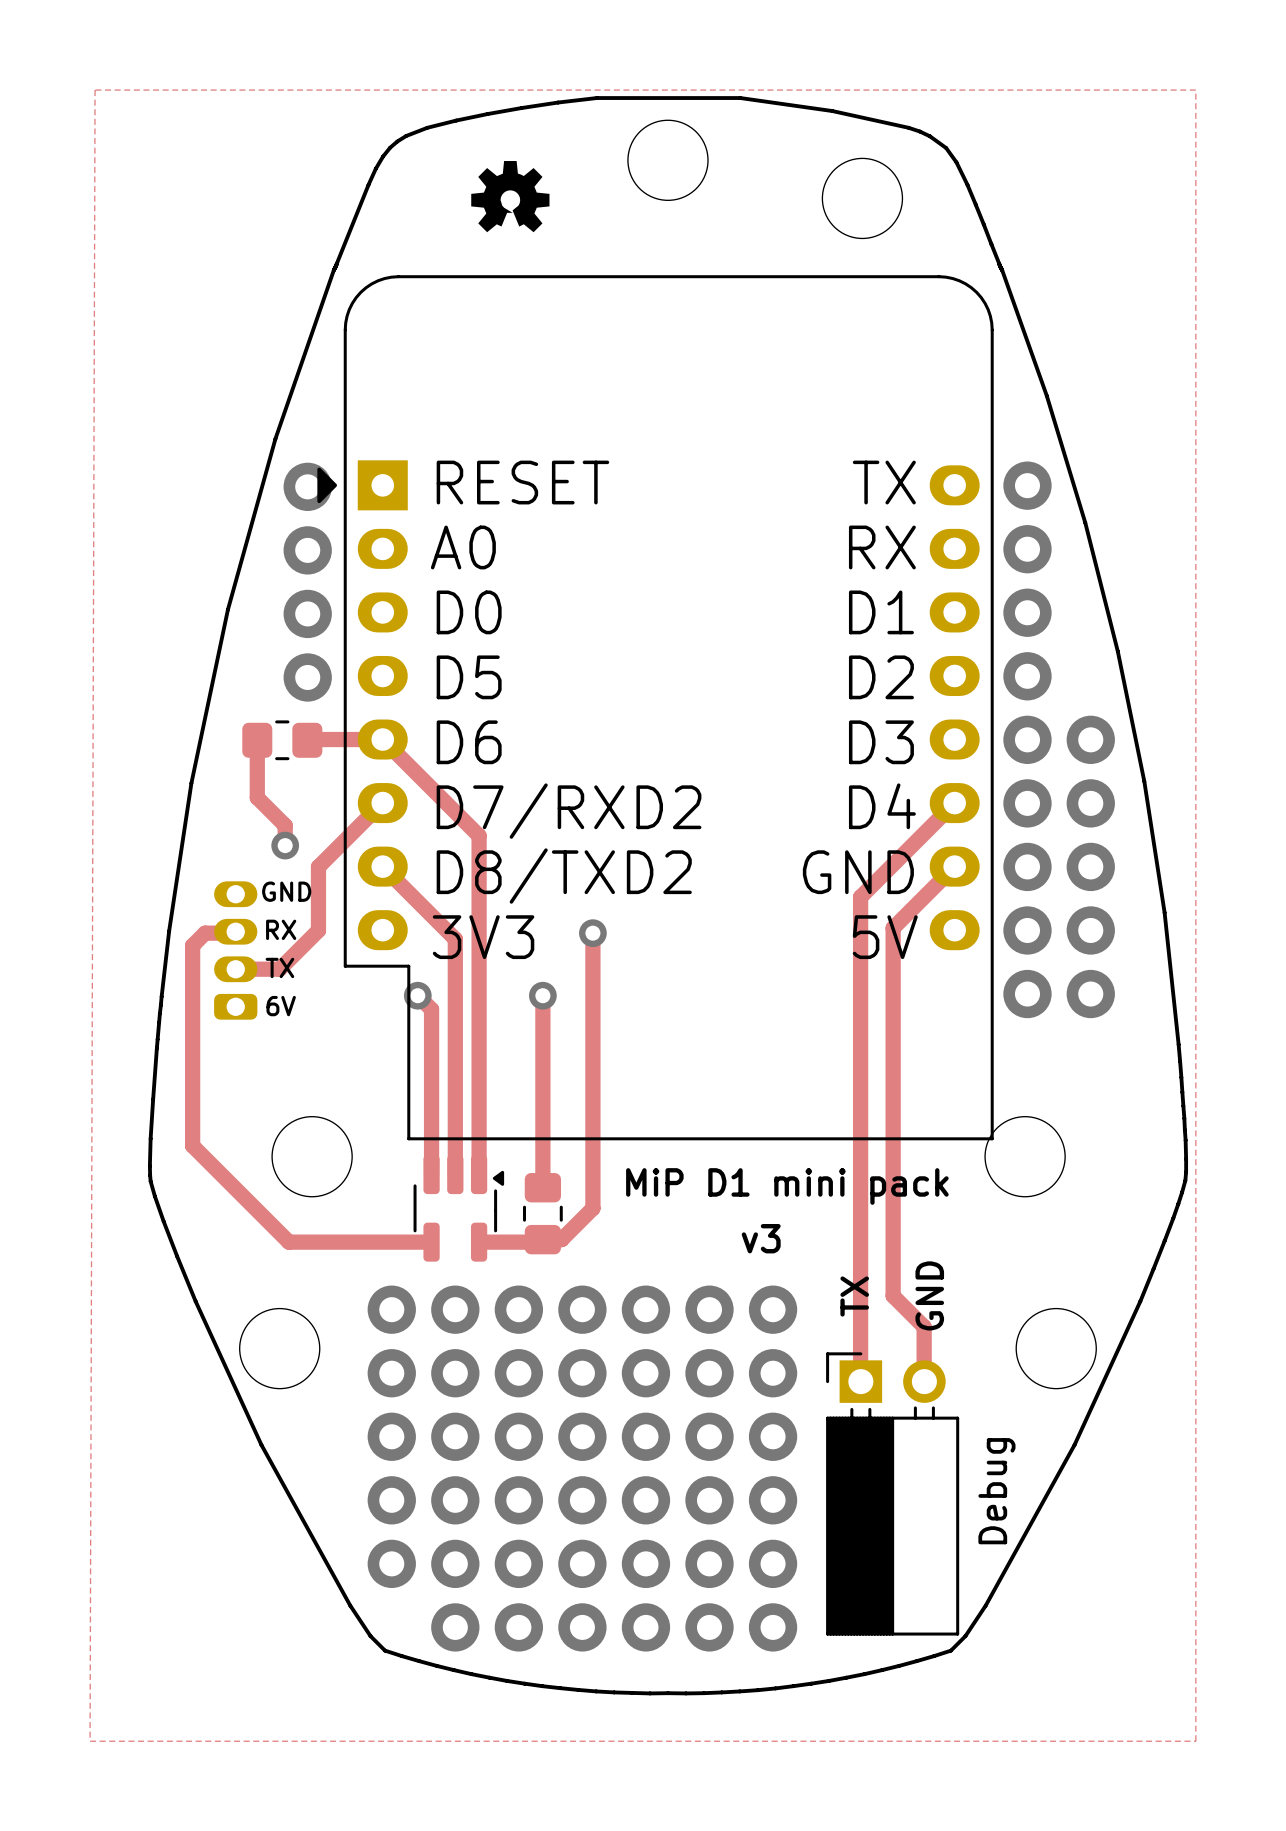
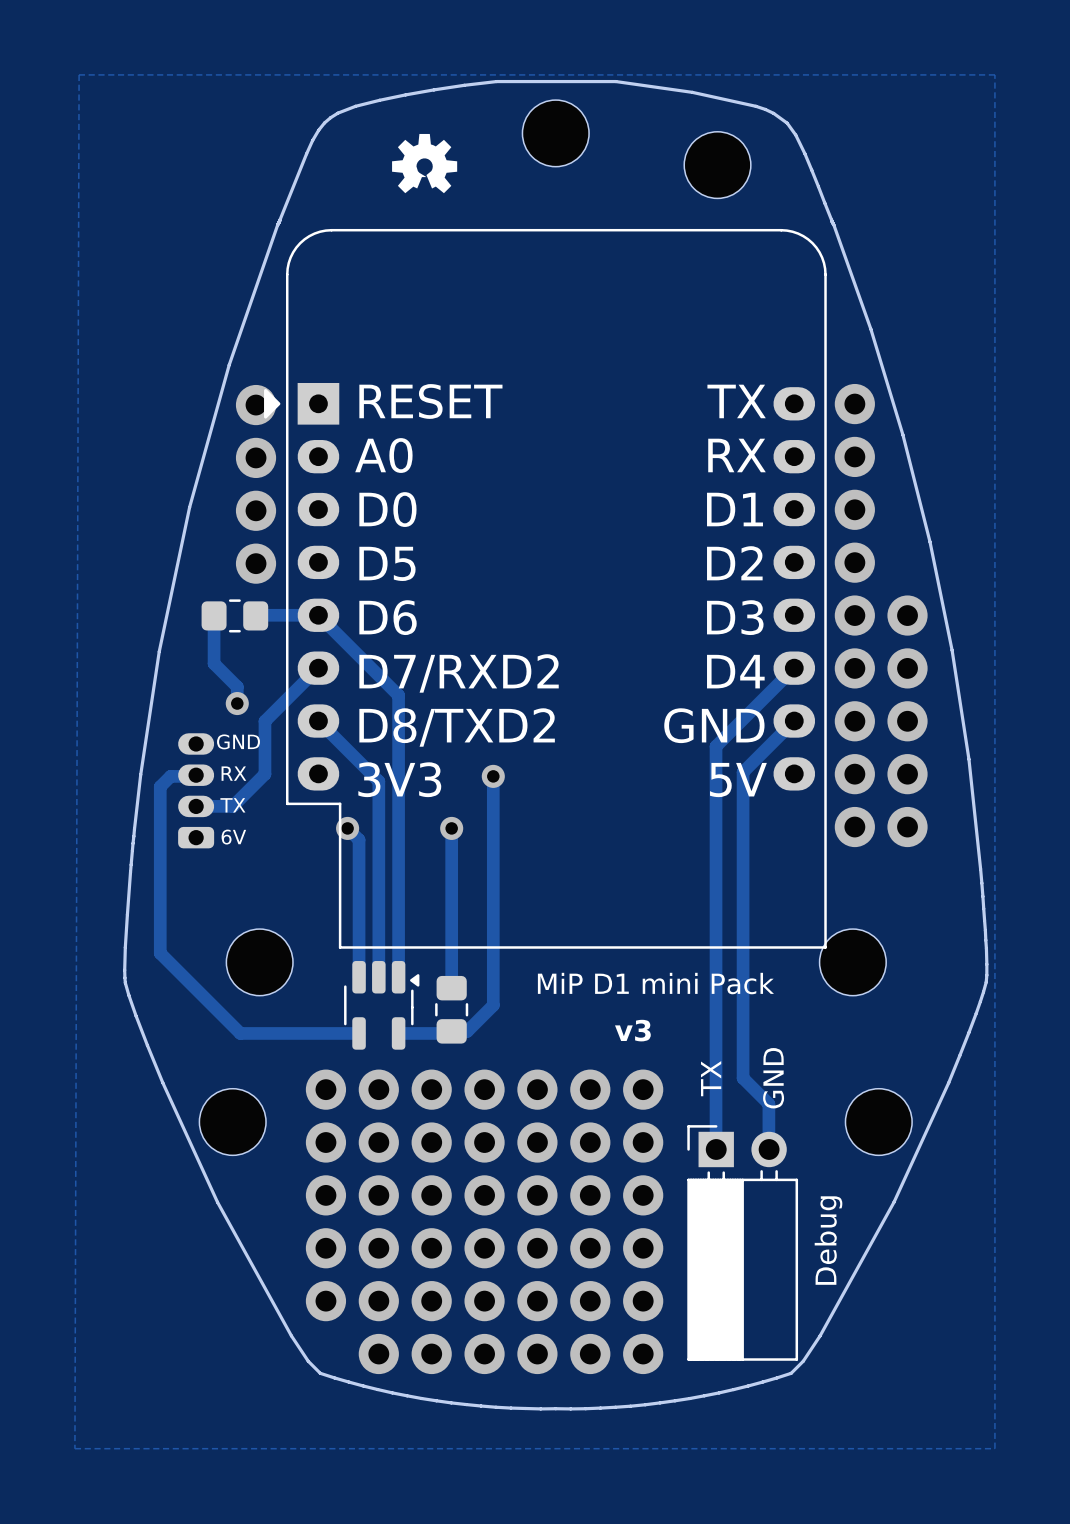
text: MiP D1 mini pack (787, 1186) -> MiP D1 mini Pack (655, 983)

